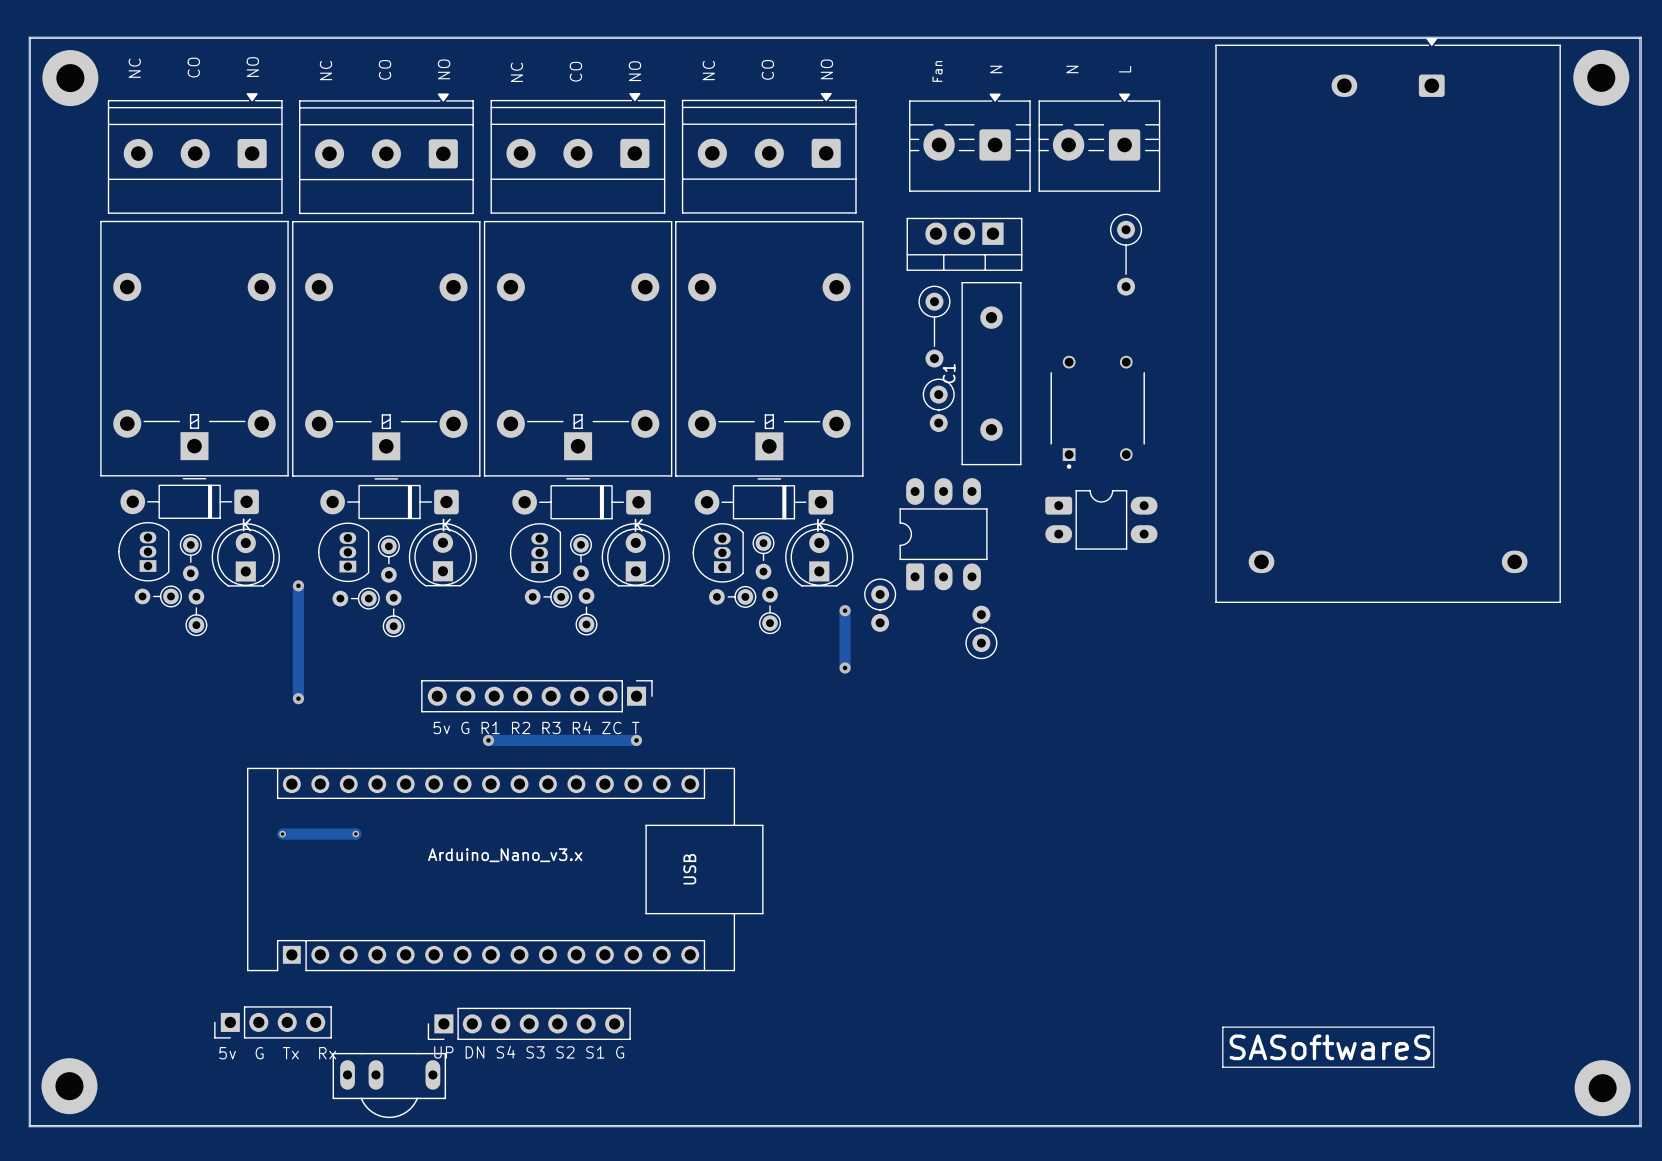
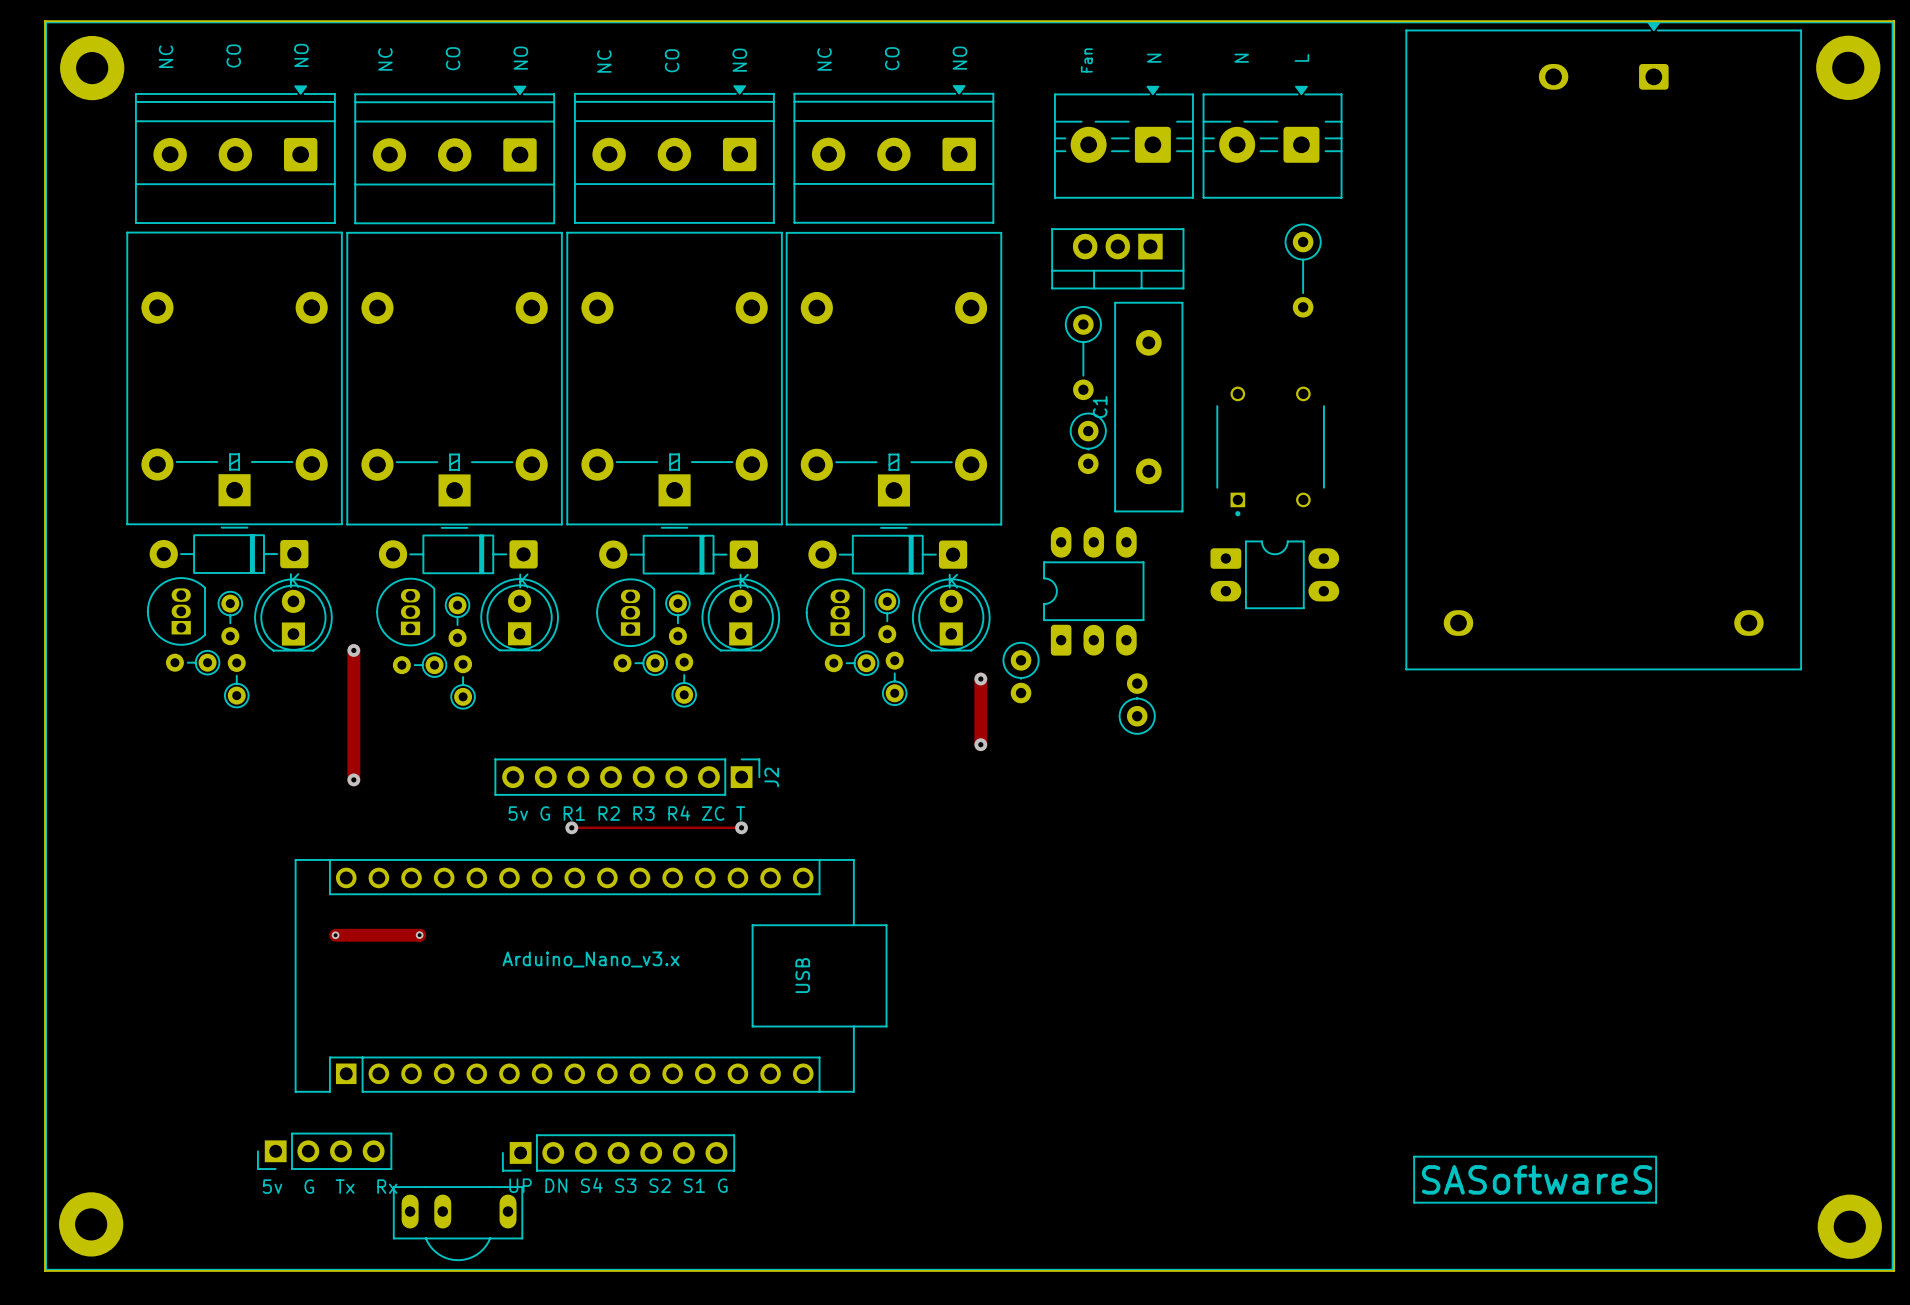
J2 name: none -> J2 (771, 777)
track width: thick (488, 740) (636, 740) -> thin (571, 827) (741, 827)

